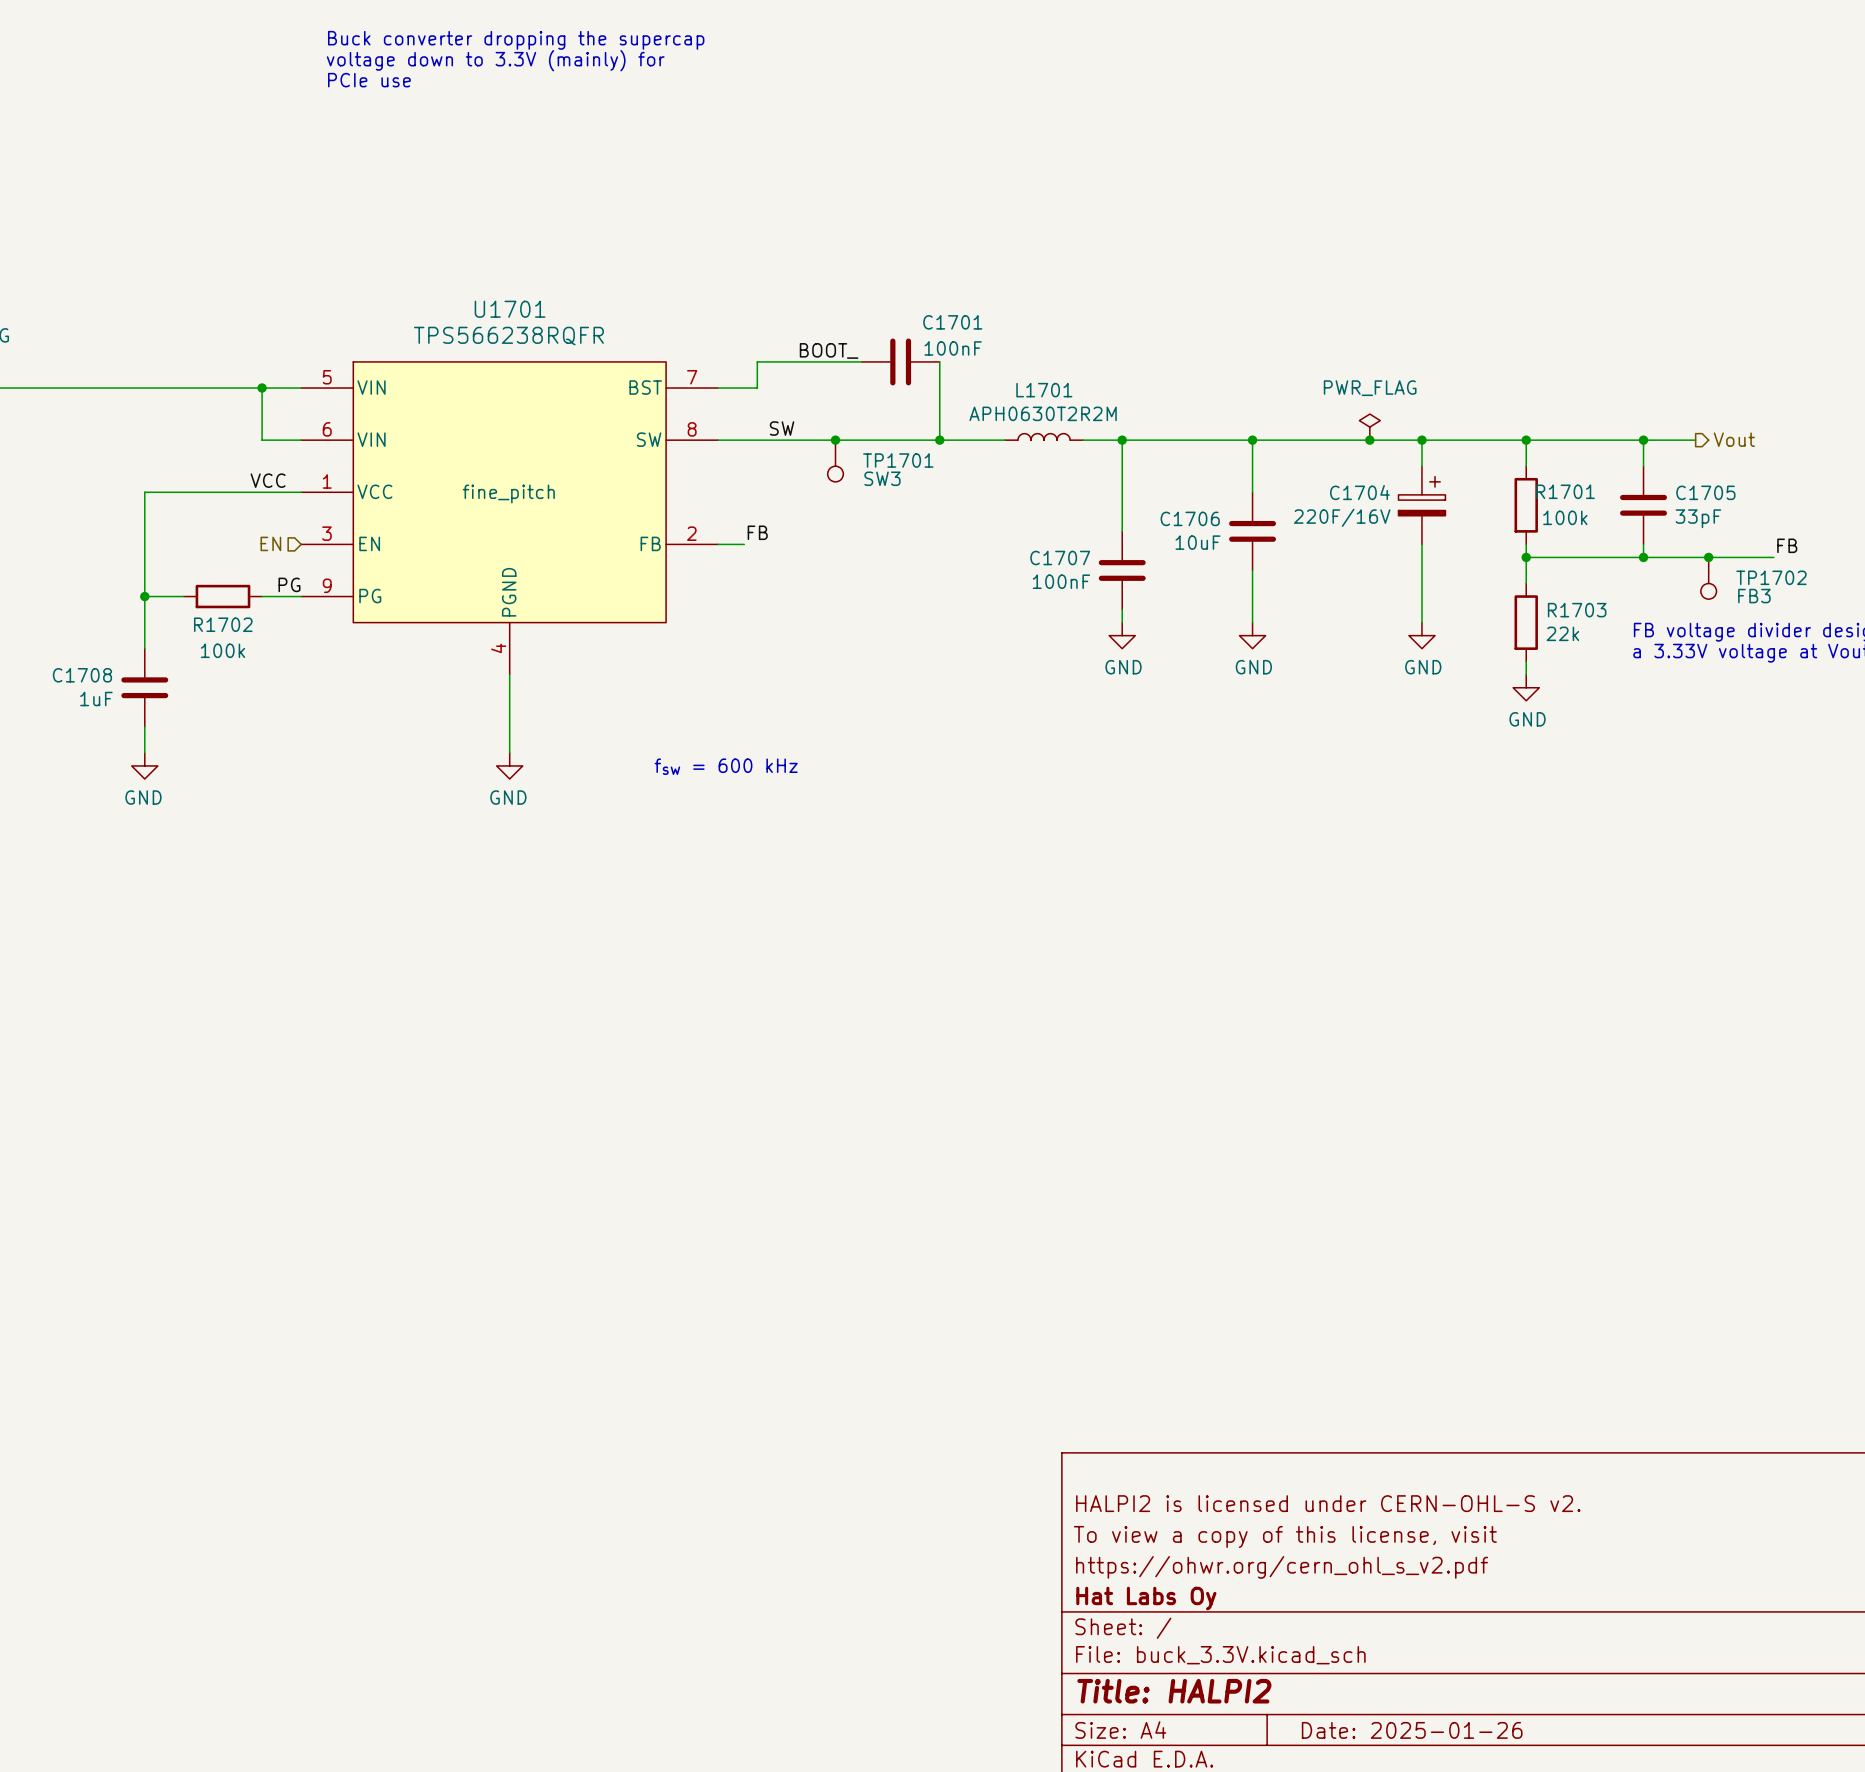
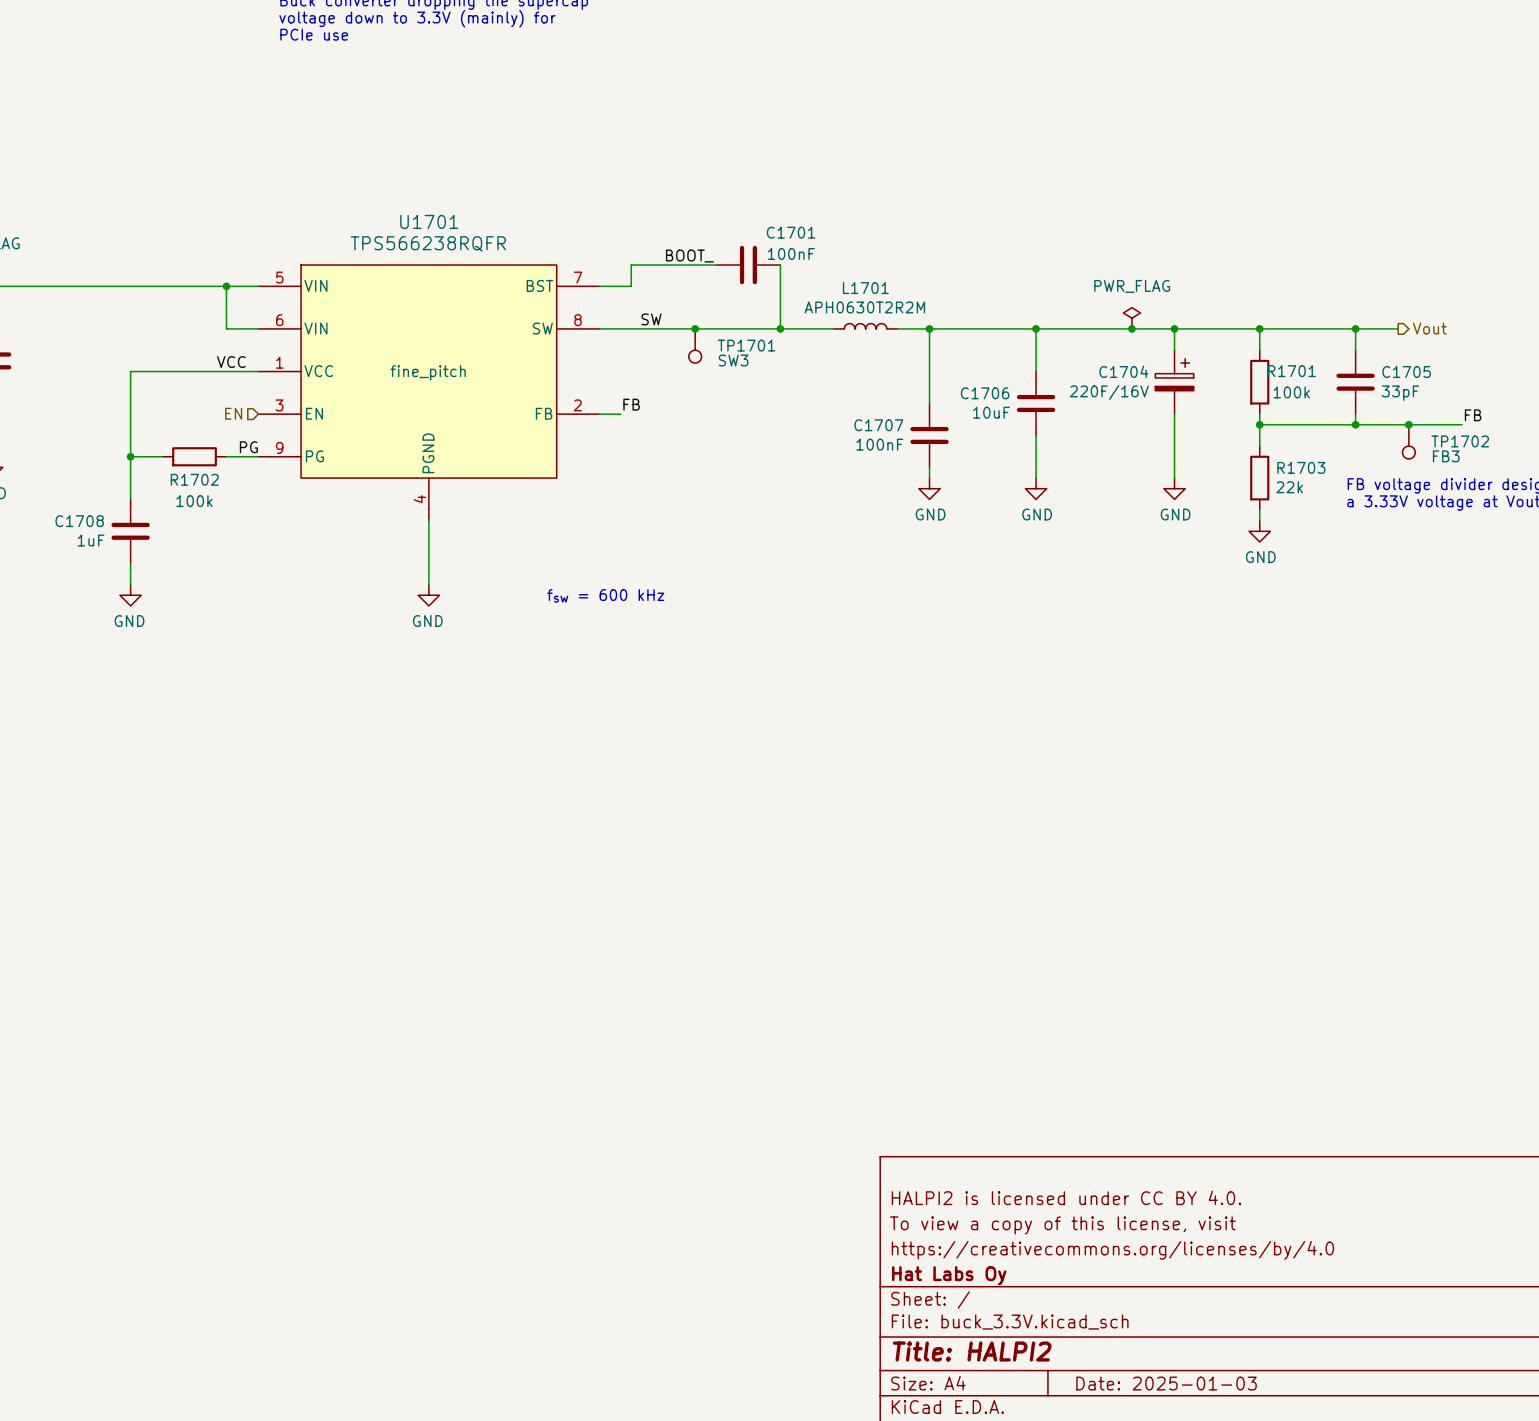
title block: HALPI2 is licensed under CERN-OHL-S v2. (1328, 1503) -> HALPI2 is licensed under CC BY 4.0. (1066, 1197)
title block: https://ohwr.org/cern_ohl_s_v2.pdf (1282, 1567) -> https://creativecommons.org/licenses/by/4.0 (1112, 1250)
title block: Date: 2025-01-26 (1412, 1730) -> Date: 2025-01-03 (1166, 1383)

